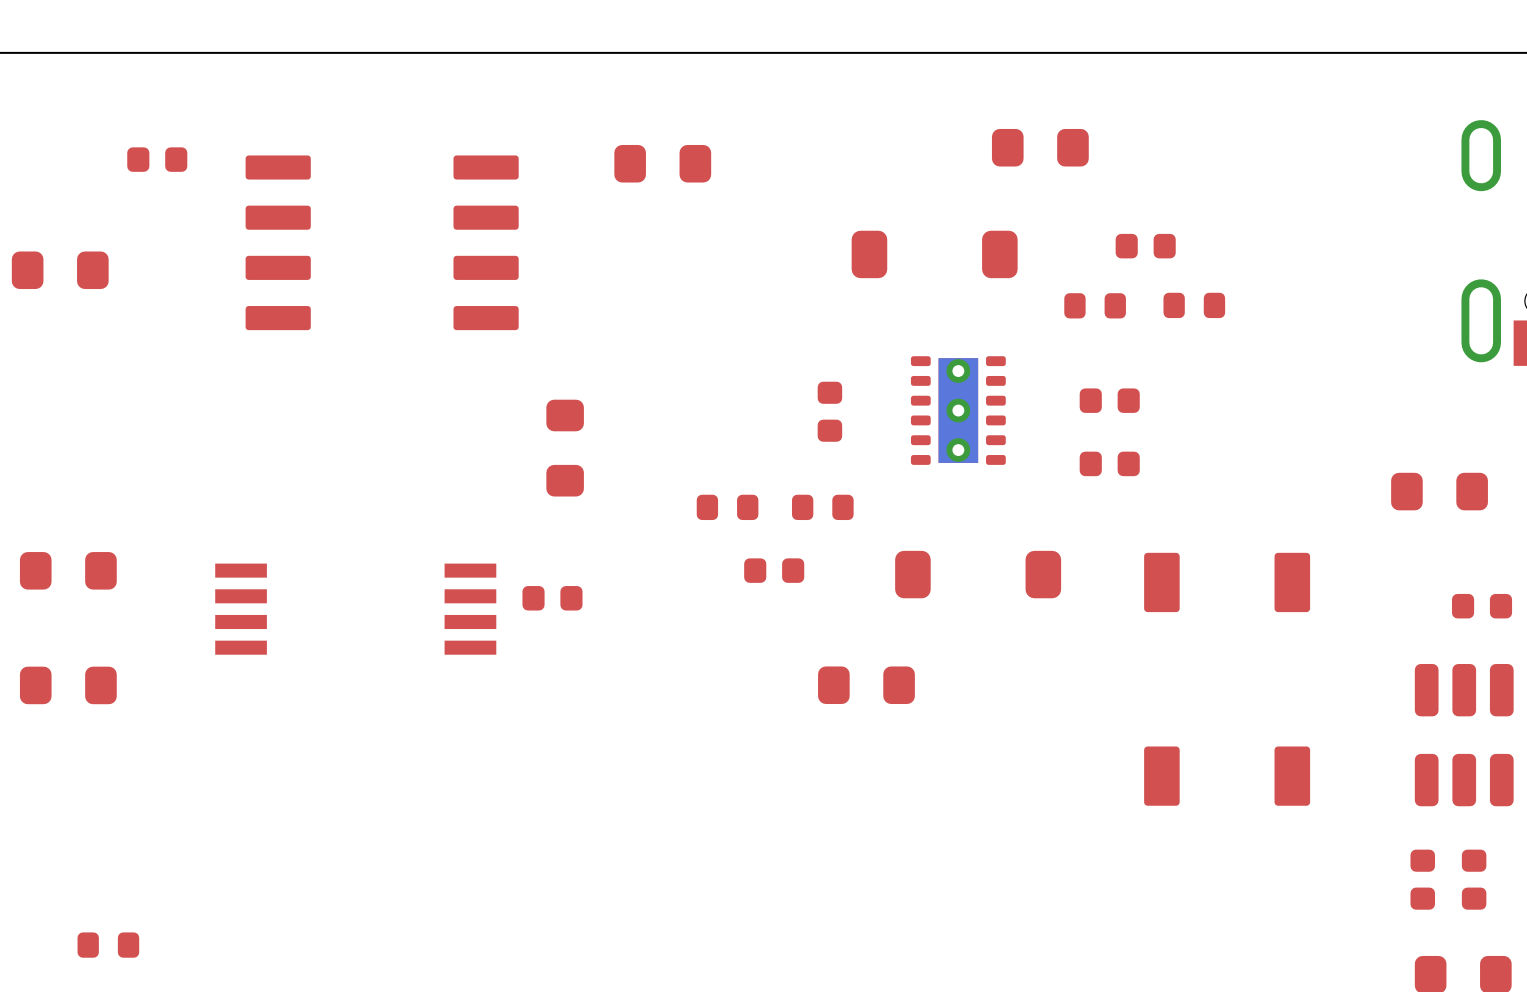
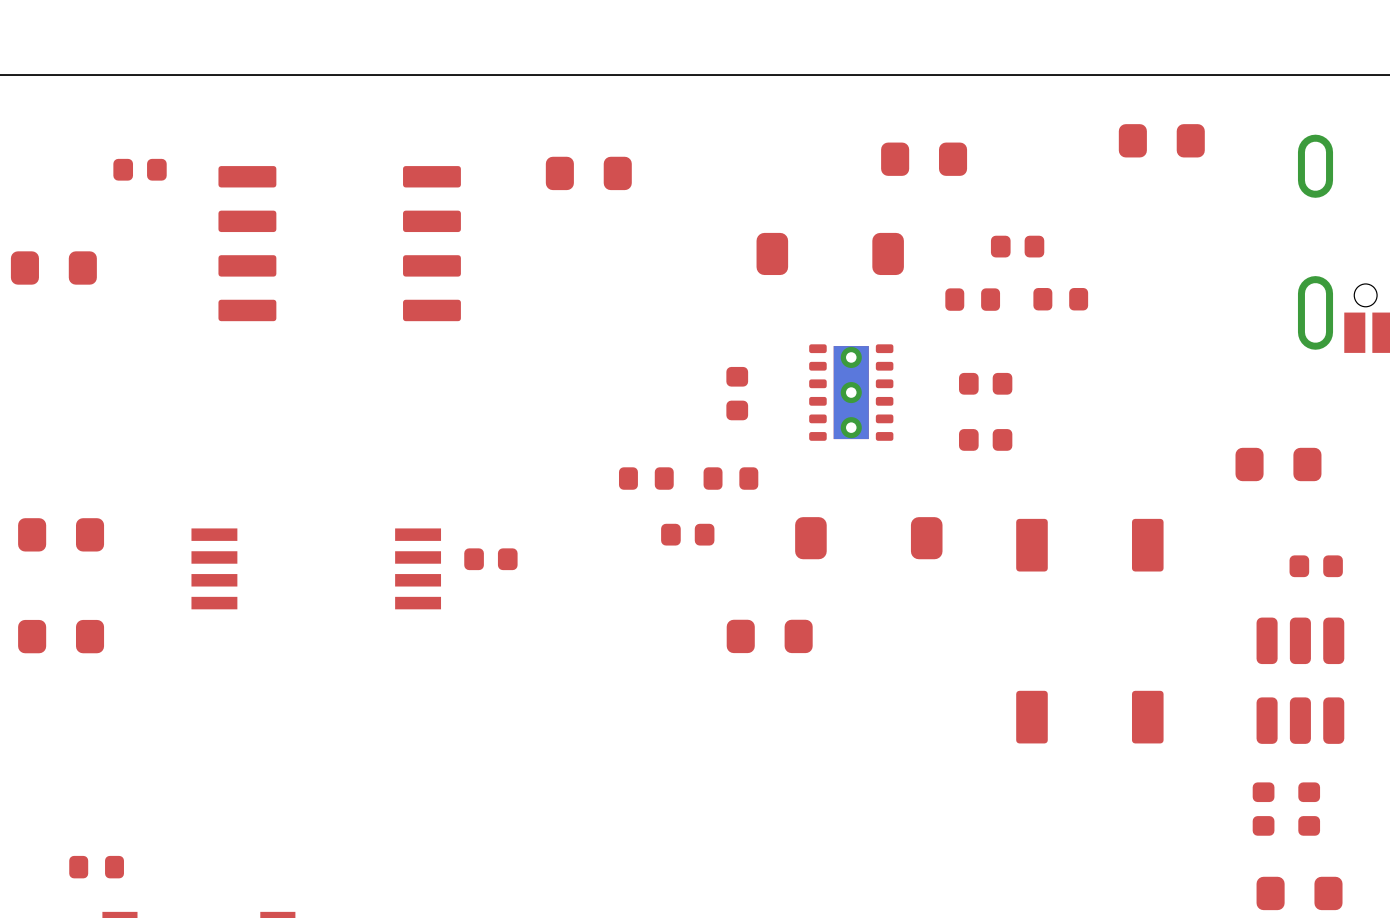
part rotation: 0° (565, 448) -> 90° clockwise (1161, 140)
part position: (565, 448) -> (1161, 140)

